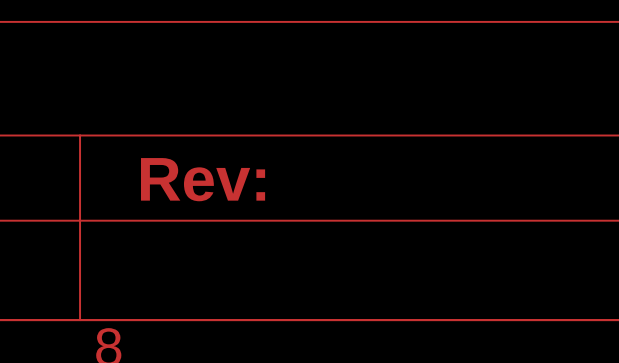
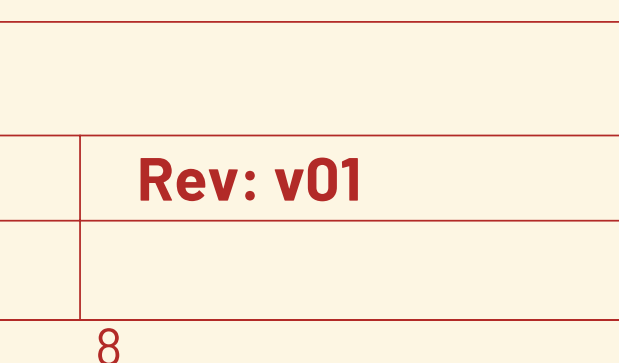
title block: Rev: (203, 179) -> Rev: v01 (249, 179)

